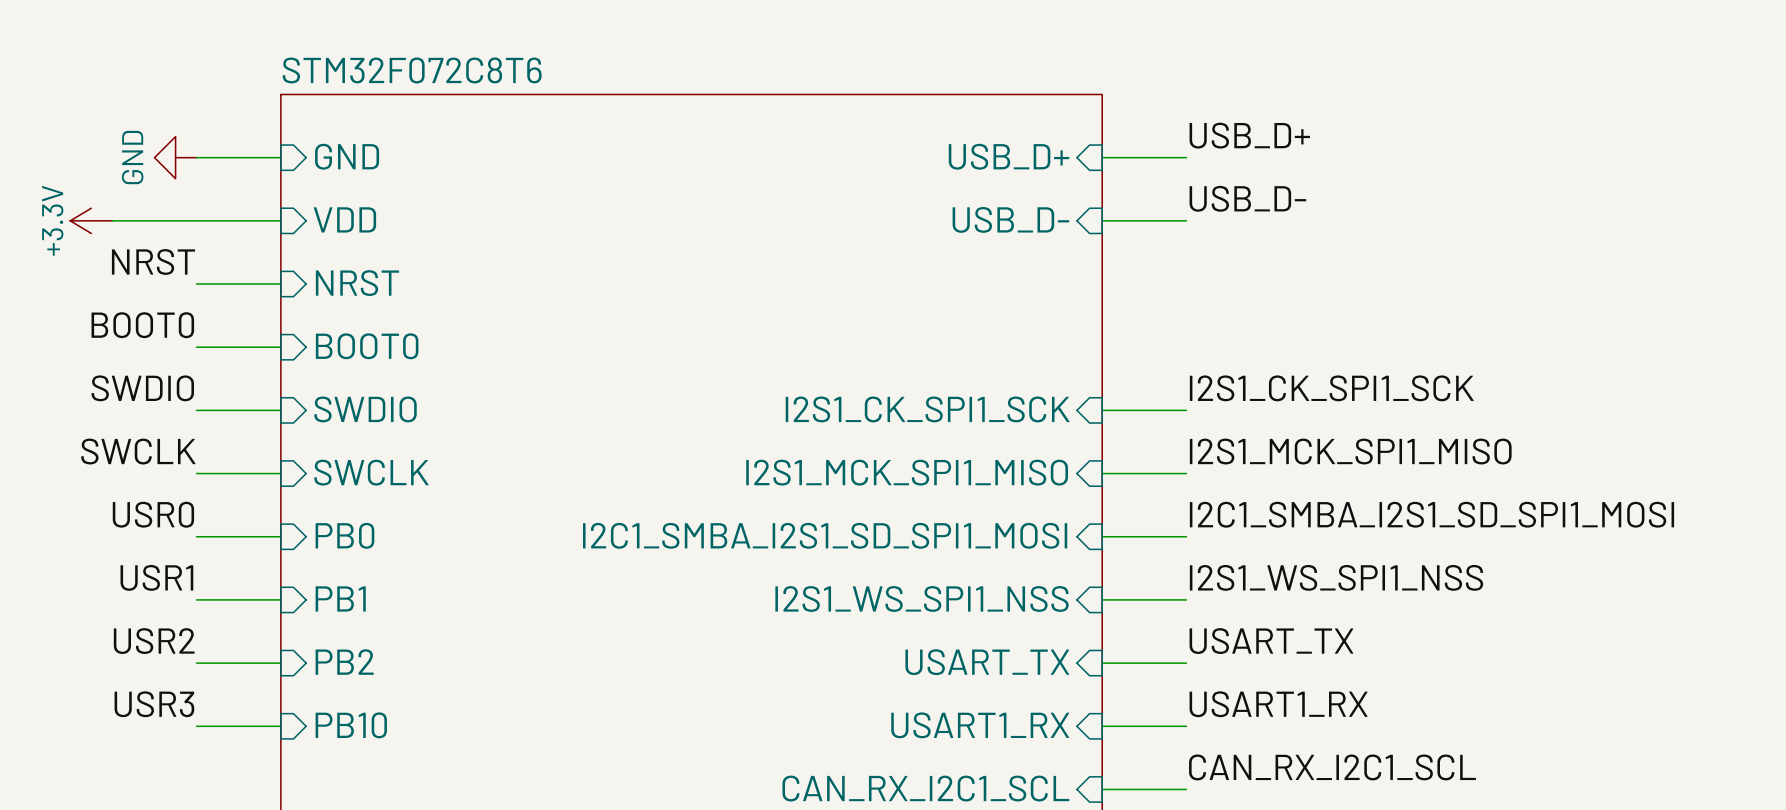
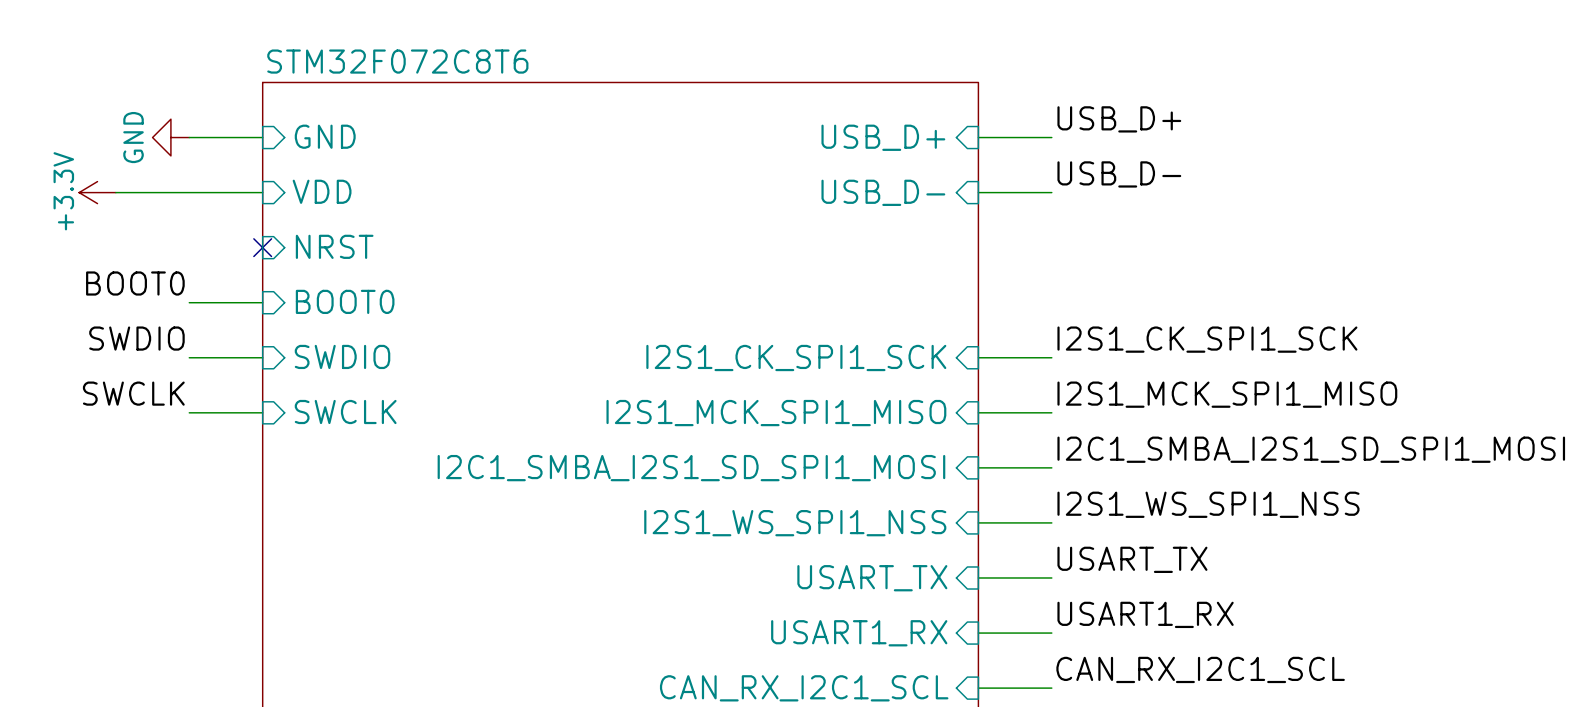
label: NRST (153, 261) -> none
wire: (196, 284) (280, 284) -> none
no-connect mark: none -> (262, 247)
label: USR0 (153, 514) -> none
sheet pin: PB0 (344, 535) -> none
wire: (196, 536) (280, 536) -> none
label: USR1 (156, 577) -> none
sheet pin: PB1 (340, 598) -> none
wire: (196, 599) (280, 599) -> none
label: USR2 (154, 641) -> none
sheet pin: PB2 (344, 662) -> none
wire: (196, 663) (280, 663) -> none
label: USR3 (154, 704) -> none
sheet pin: PB10 (351, 725) -> none
wire: (196, 726) (280, 726) -> none

